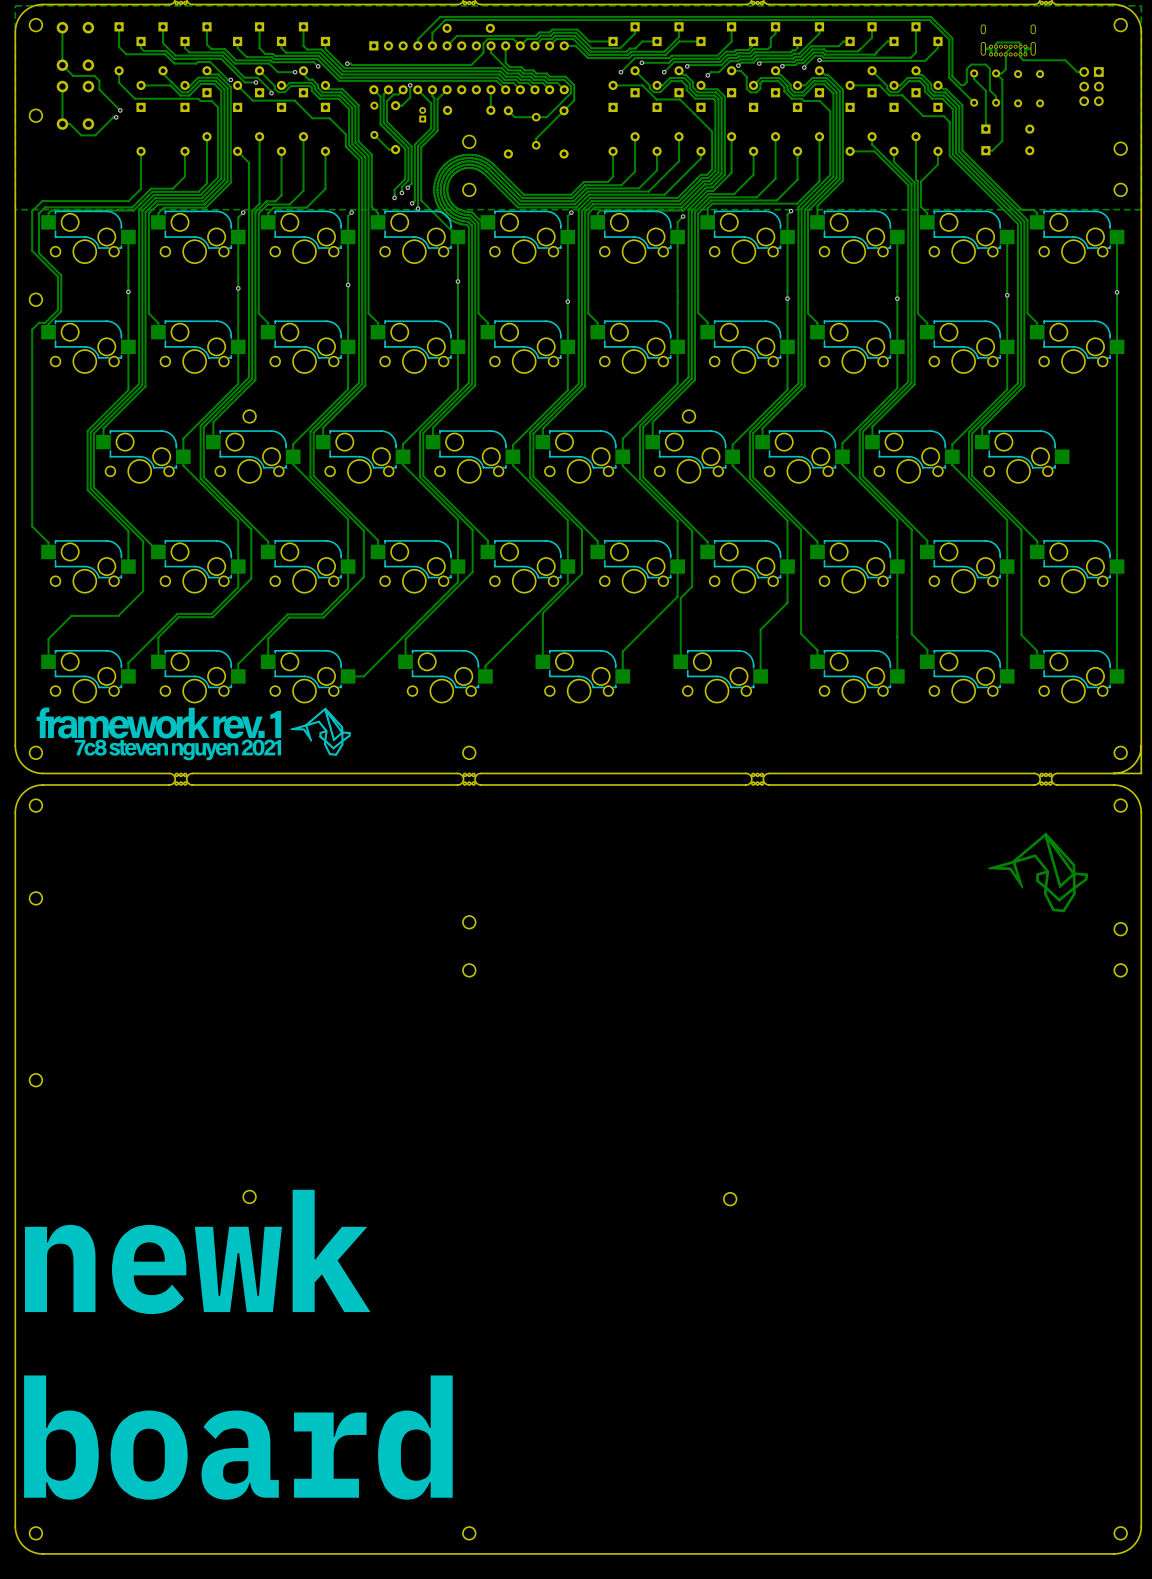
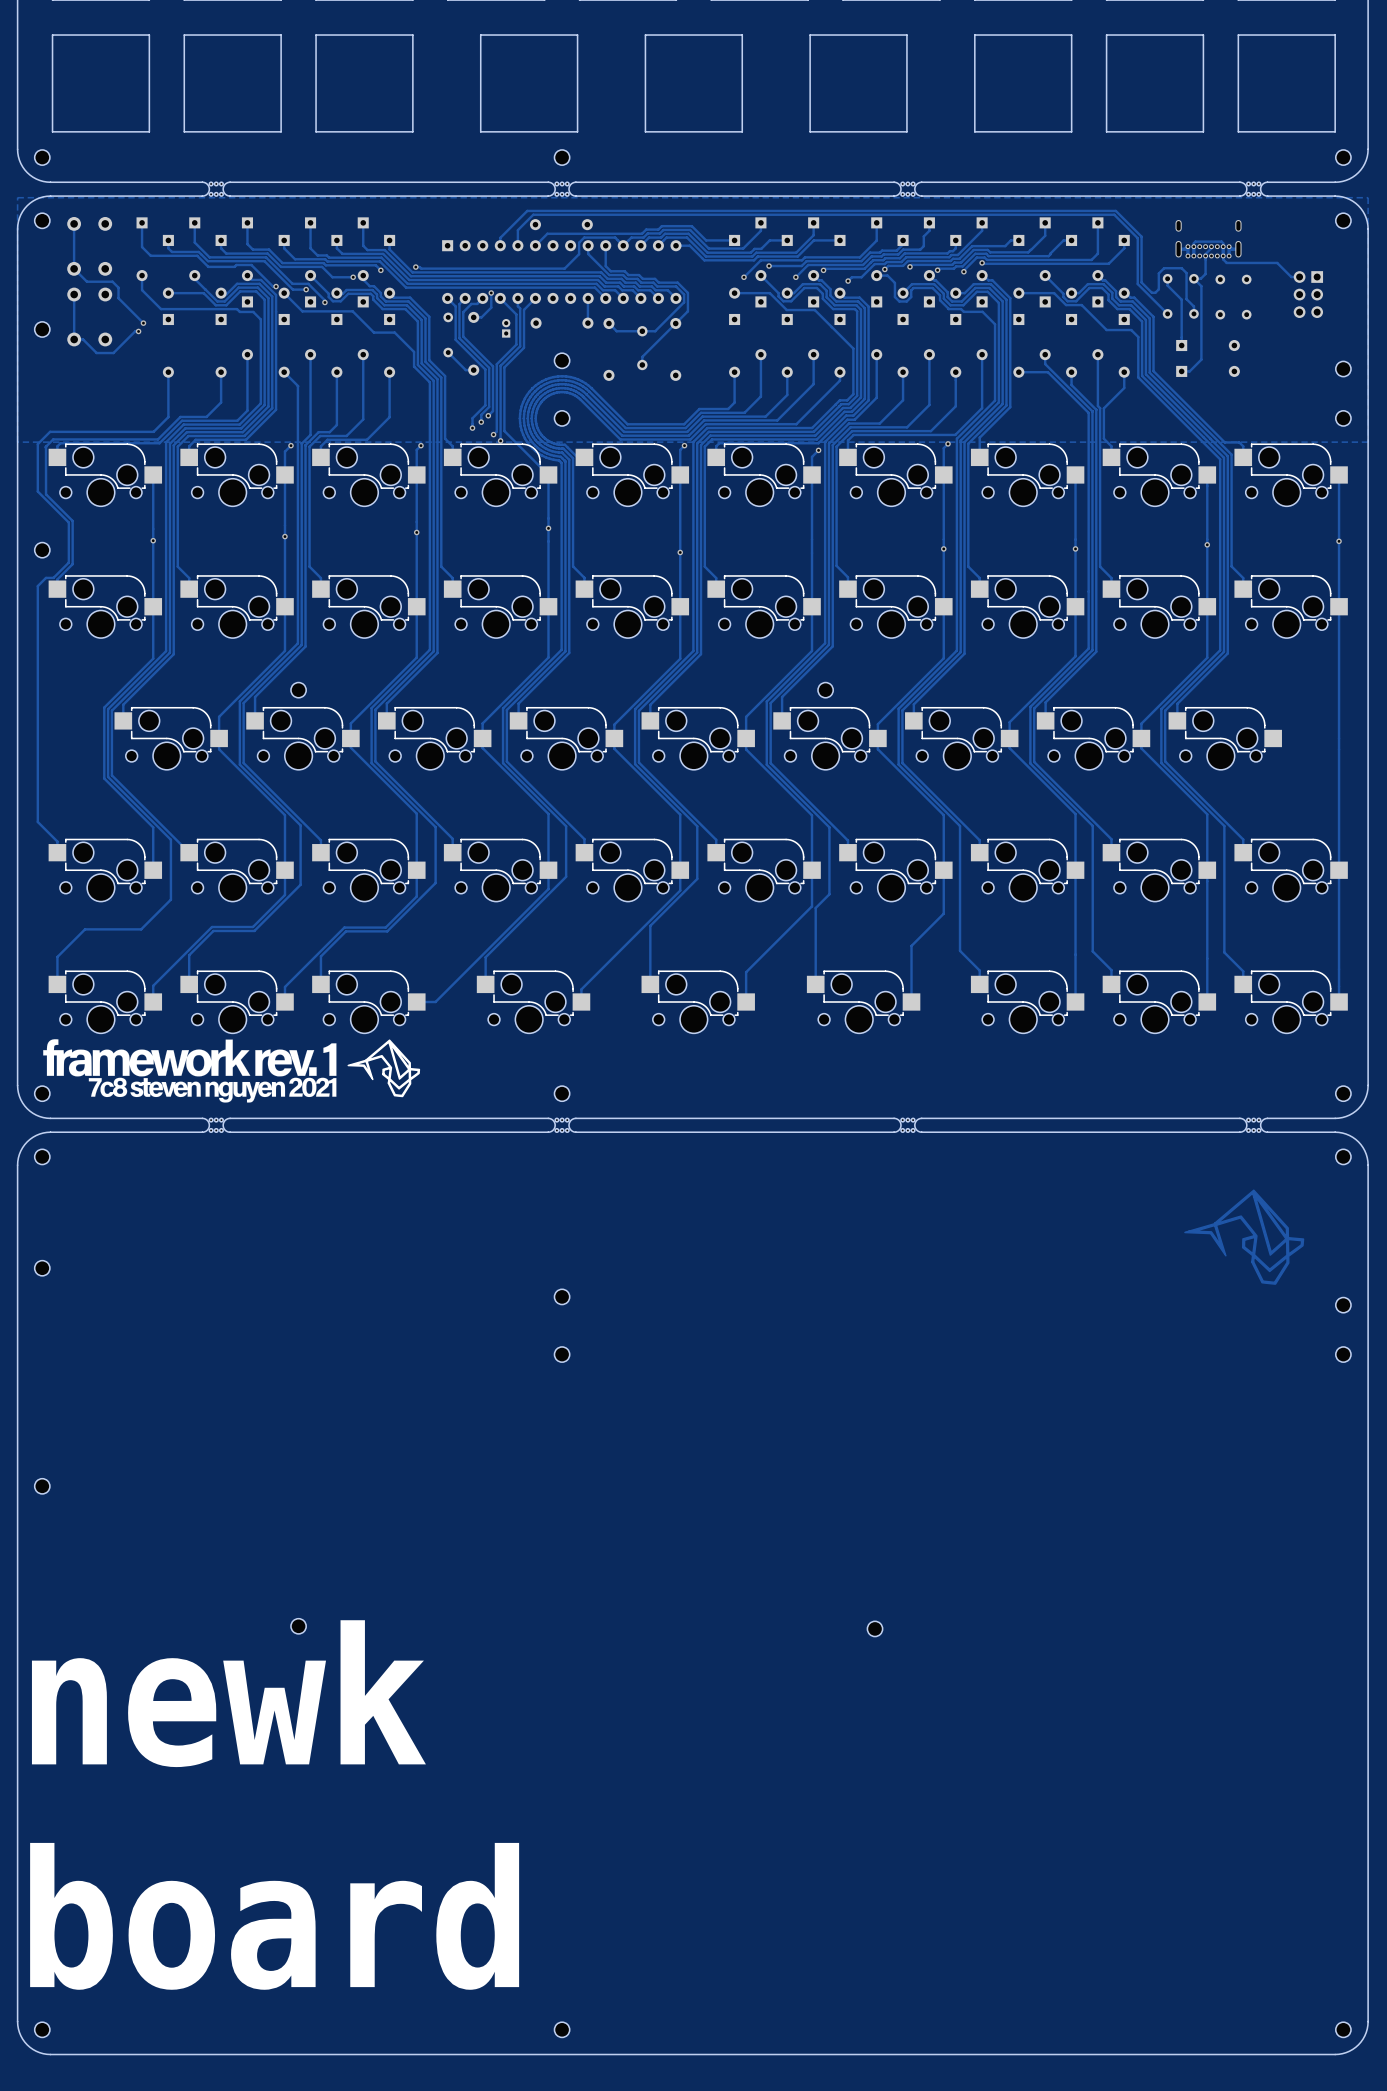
board edge: (1141, 746) (1141, 773) (1113, 773) -> none

